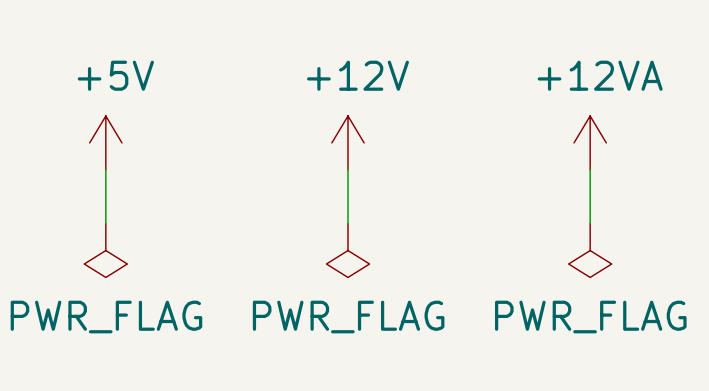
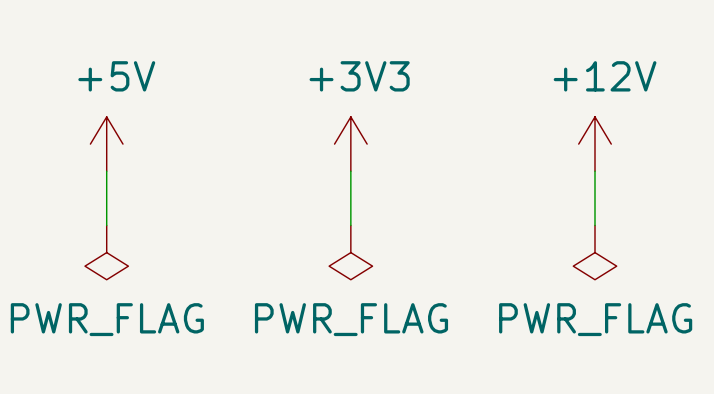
power symbol: +12V (348, 142) -> +3V3 (350, 144)
power symbol: +12VA (590, 142) -> +12V (594, 144)

